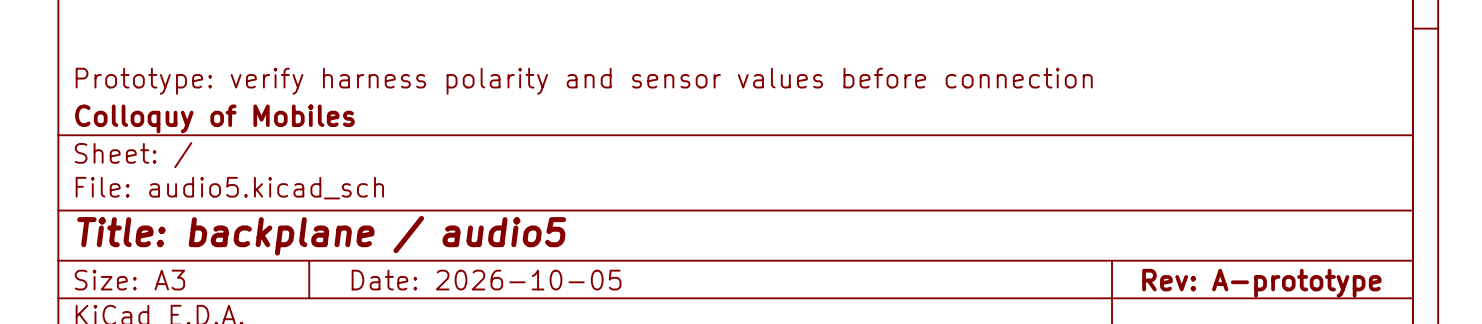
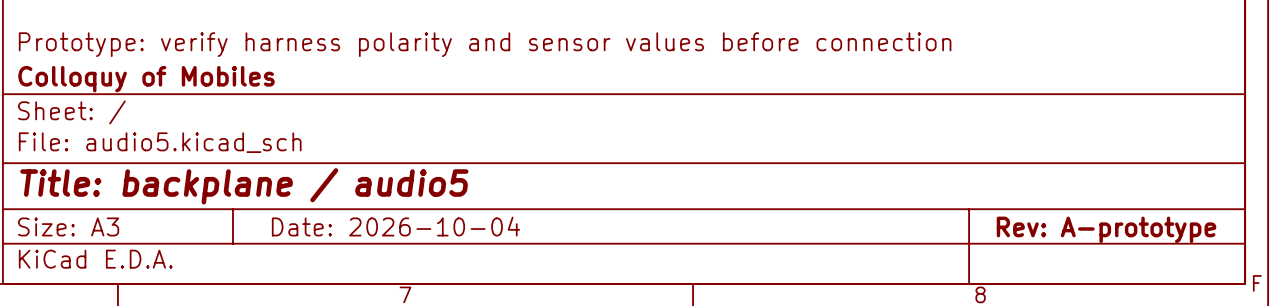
title block: Date: 2026-10-05 (486, 280) -> Date: 2026-10-04 (395, 226)

